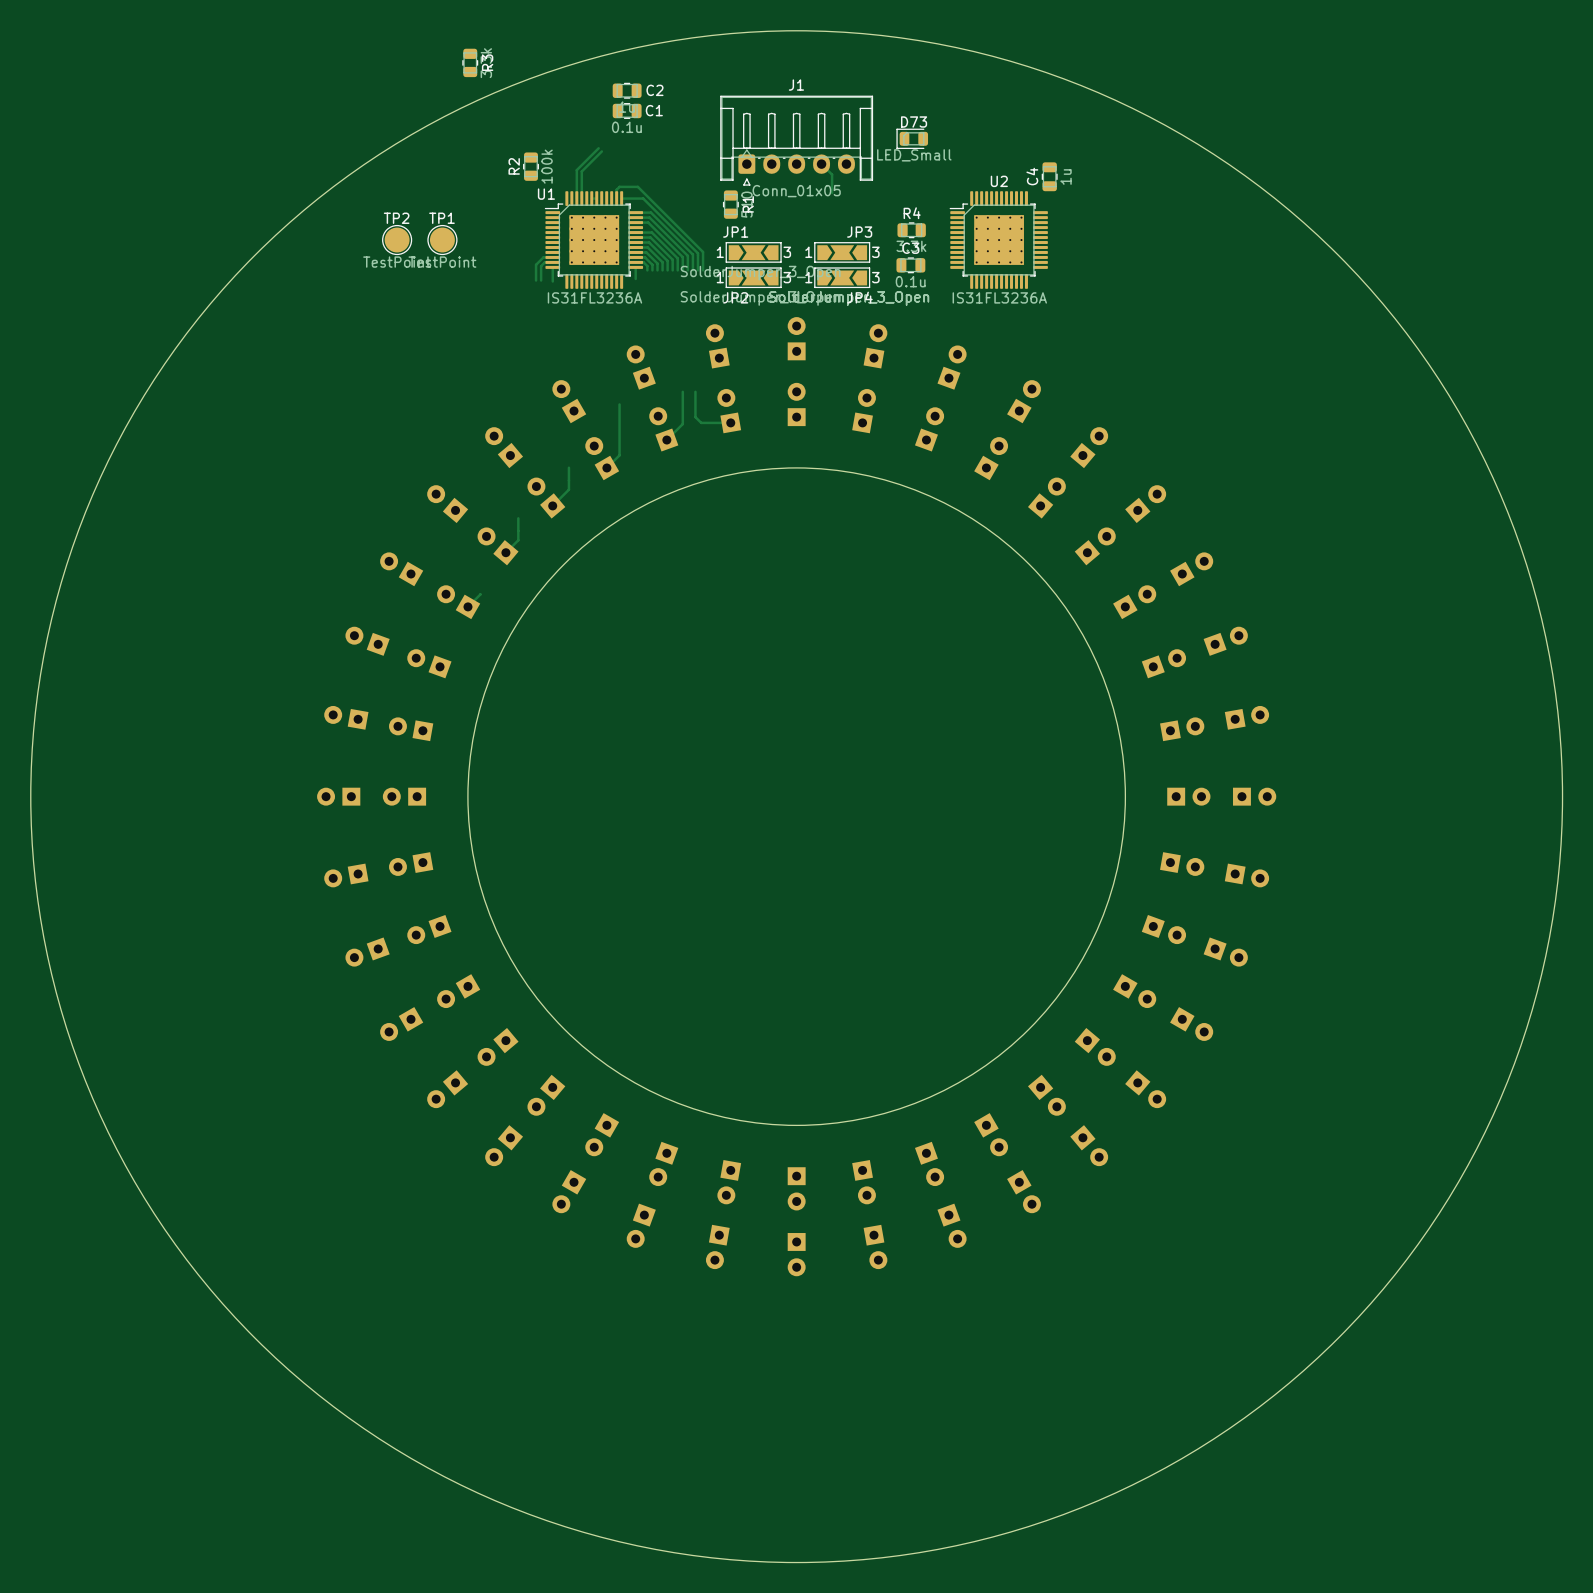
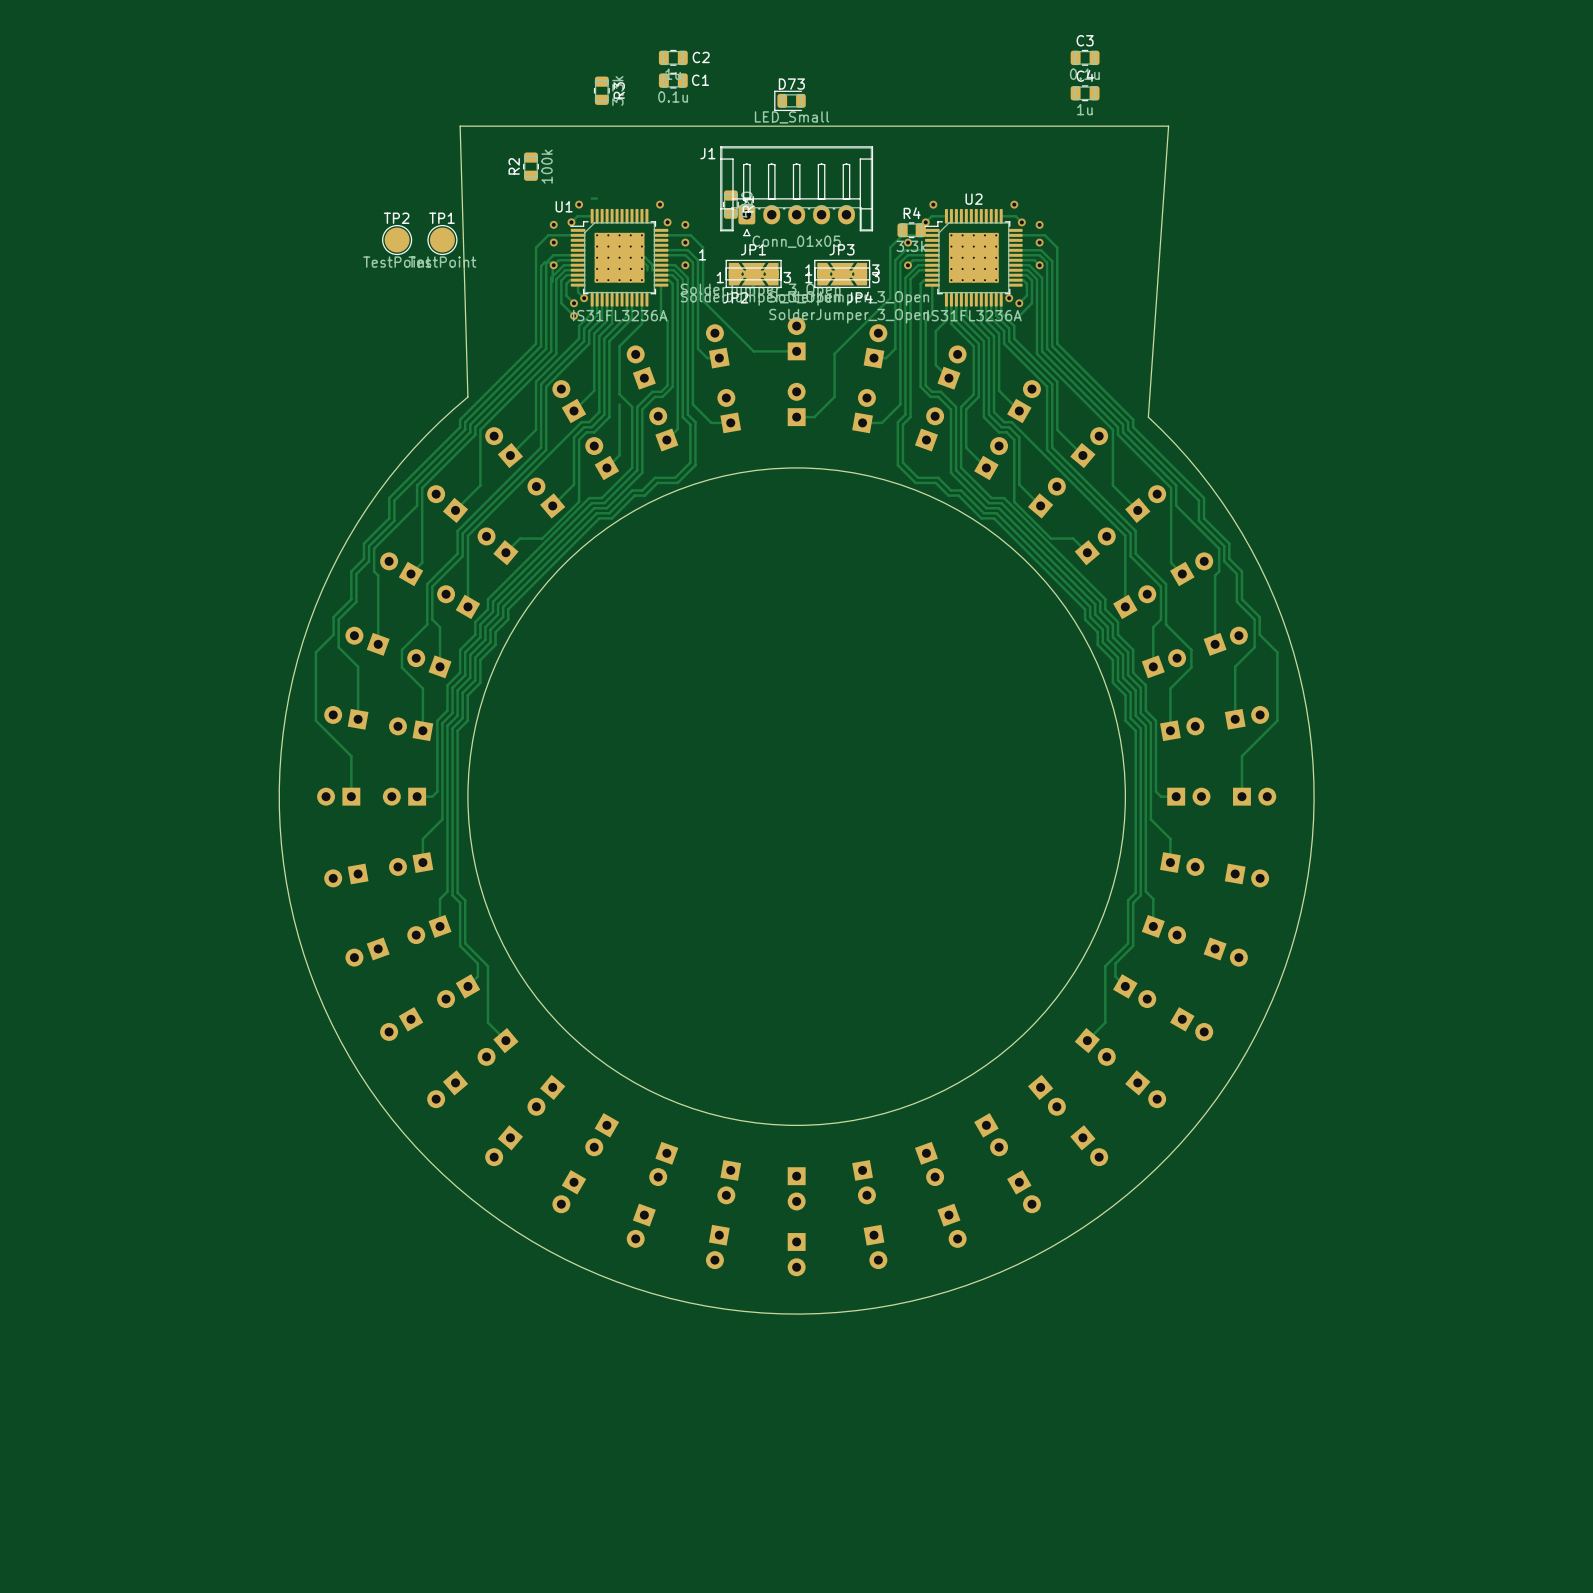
round board edge: [30, 30, 1564, 1564] -> none
R3 position: (470, 62) -> (601, 90)
J1 name position: J1 (796, 85) -> J1 (707, 153)
C2 position: (627, 90) -> (673, 57)
C1 position: (627, 110) -> (673, 80)
board edge: none -> (460, 126) (1168, 126) (1148, 417) (1187, 457) (1221, 501) (1259, 566) (1282, 617) (1298, 671) (1309, 726) (1314, 801) (1310, 857) (1296, 930) (1279, 983) (1246, 1051) (1216, 1098) (1168, 1156) (1127, 1194) (1082, 1227) (1034, 1256) (983, 1279) (929, 1296) (874, 1308) (837, 1312) (781, 1313) (744, 1311) (688, 1302) (634, 1288) (582, 1267) (548, 1250) (501, 1221) (456, 1186) (429, 1161) (392, 1119) (359, 1073) (332, 1024) (304, 955) (289, 900) (283, 864) (279, 789) (285, 714) (297, 659) (308, 624) (322, 589) (347, 539) (378, 492) (401, 462) (439, 421) (467, 397) (460, 126)
D73 position: (912, 138) -> (790, 100)
J1 position: (796, 140) -> (796, 191)
track: (598, 148) (576, 170) (576, 198) -> none
track: (601, 151) (581, 171) (581, 198) -> none
track: (821, 164) (832, 174) (832, 192) -> none
C4 rotation: 0° (1049, 176) -> 90° clockwise (1085, 93)
C4 position: (1049, 176) -> (1085, 93)
U1 name position: U1 (546, 194) -> U1 (564, 206)
track: (616, 198) (616, 189) (619, 186) (637, 186) (703, 252) -> (661, 235) (690, 235) (703, 247) (703, 252)
track: (621, 198) (643, 198) (697, 253) (697, 260) -> (661, 250) (687, 250) (697, 260)
via: none -> (579, 204)
via: none -> (660, 204)
via: none -> (933, 204)
via: none -> (1014, 204)
track: (635, 212) (650, 212) (692, 254) (692, 262) -> (661, 255) (685, 255) (692, 262)
track: none -> (592, 216) (577, 216) (571, 222)
track: none -> (946, 216) (931, 216) (925, 222)
track: none -> (1001, 216) (1015, 216) (1021, 222)
track: (635, 217) (649, 217) (687, 255) (687, 270) -> none
via: none -> (571, 222)
track: (635, 222) (648, 222) (682, 257) (682, 270) -> none
via: none -> (667, 222)
via: none -> (925, 222)
via: none -> (1021, 222)
via: none -> (553, 224)
via: none -> (685, 224)
via: none -> (1039, 224)
track: (635, 232) (651, 232) (677, 258) (677, 270) -> none
JP1 name position: JP1 (735, 232) -> JP1 (753, 249)
JP3 name position: JP3 (859, 232) -> JP3 (841, 249)
track: none -> (932, 235) (902, 235) (890, 247) (890, 298) (834, 353) (834, 396) (814, 417) (796, 417)
track: none -> (1015, 235) (1044, 235) (1057, 247) (1057, 343) (1133, 419) (1133, 427) (1204, 498) (1204, 518) (1229, 543) (1229, 558) (1241, 571) (1241, 599) (1259, 617) (1259, 634) (1277, 652) (1277, 720) (1241, 756) (1241, 796)
track: (635, 237) (650, 237) (672, 259) (672, 270) -> none
U1 position: (593, 240) -> (619, 257)
U2 position: (998, 240) -> (973, 257)
via: none -> (553, 242)
track: (635, 242) (649, 242) (667, 260) (667, 270) -> none
via: none -> (685, 242)
via: none -> (908, 242)
via: none -> (1039, 242)
track: (635, 247) (647, 247) (662, 262) (662, 270) -> none
track: none -> (932, 250) (905, 250) (895, 260) (895, 348) (886, 358) (873, 358)
track: none -> (1015, 250) (1041, 250) (1052, 261) (1052, 346) (1128, 422) (1128, 429) (1198, 500) (1198, 520) (1224, 546) (1224, 561) (1236, 574) (1236, 601) (1254, 619) (1254, 647) (1235, 666) (1235, 719)
track: (635, 252) (646, 252) (657, 263) (657, 270) -> none
JP1 text position: 1 (720, 252) -> 1 (702, 254)
JP1 position: (753, 252) -> (753, 270)
JP1 text: 3 (787, 252) -> none
JP3 position: (842, 252) -> (842, 270)
track: none -> (578, 255) (553, 255) (546, 262) (546, 348) (470, 424) (470, 432) (417, 485) (417, 505) (374, 548) (374, 571) (378, 575) (378, 644)
track: none -> (932, 255) (907, 255) (900, 262) (900, 404) (881, 422) (862, 422)
track: none -> (1015, 255) (1039, 255) (1047, 262) (1047, 348) (1123, 424) (1123, 432) (1176, 485) (1176, 505) (1219, 548) (1219, 571) (1215, 575) (1215, 644)
track: (552, 257) (543, 257) (536, 264) -> (578, 235) (548, 235) (536, 247) (536, 264)
track: none -> (578, 260) (558, 260) (553, 265)
track: none -> (932, 260) (912, 260) (907, 265)
track: none -> (1015, 260) (1034, 260) (1039, 265)
via: none -> (553, 265)
track: none -> (578, 265) (563, 265) (551, 277) (551, 351) (475, 427) (475, 434) (422, 487) (422, 562) (411, 574)
track: none -> (661, 265) (675, 265) (687, 277) (687, 414) (695, 422) (695, 465) (677, 482) (657, 482) (644, 495) (634, 495) (611, 518) (599, 518) (508, 609) (508, 619) (495, 632) (495, 644) (480, 660) (480, 682) (467, 695) (467, 720) (457, 730) (457, 892) (465, 900) (465, 943) (487, 966) (487, 1022) (505, 1040)
via: none -> (685, 265)
via: none -> (907, 265)
C3 position: (910, 265) -> (1085, 57)
track: none -> (932, 265) (918, 265) (905, 277) (905, 414) (897, 422) (897, 465) (915, 482) (935, 482) (948, 495) (958, 495) (981, 518) (994, 518) (1085, 609) (1085, 619) (1097, 632) (1097, 644) (1112, 660) (1112, 682) (1125, 695) (1125, 720) (1135, 730) (1135, 892) (1128, 900) (1128, 943) (1105, 966) (1105, 1022) (1087, 1040)
track: none -> (1015, 265) (1029, 265) (1042, 277) (1042, 351) (1117, 427) (1117, 434) (1171, 487) (1171, 562) (1182, 574)
via: none -> (1039, 265)
track: (635, 267) (635, 278) -> none
track: none -> (578, 270) (565, 270) (556, 279) (556, 353) (480, 429) (480, 485) (455, 510)
track: none -> (661, 270) (673, 270) (682, 279) (682, 391)
track: none -> (697, 270) (697, 348) (707, 358) (719, 358)
track: none -> (703, 270) (703, 300) (753, 351) (796, 351)
track: none -> (932, 270) (919, 270) (910, 279) (910, 417) (902, 424) (902, 462) (918, 477) (938, 477) (951, 490) (961, 490) (983, 513) (996, 513) (1090, 606) (1090, 617) (1102, 629) (1102, 642) (1117, 657) (1117, 680) (1130, 692) (1130, 718) (1140, 728) (1140, 895) (1133, 902) (1133, 945) (1115, 963) (1115, 976) (1125, 986)
track: none -> (1015, 270) (1027, 270) (1037, 279) (1037, 353) (1112, 429) (1112, 485) (1137, 510)
track: none -> (578, 275) (566, 275) (561, 280) (561, 303) (574, 315)
track: none -> (1015, 275) (1026, 275) (1031, 280) (1031, 303) (1019, 315)
track: none -> (536, 280) (536, 343) (460, 419) (460, 427) (389, 498) (389, 518) (364, 543) (364, 558) (351, 571) (351, 599) (333, 617) (333, 634) (315, 652) (315, 720) (351, 756) (351, 796)
track: none -> (541, 280) (541, 346) (465, 422) (465, 429) (394, 500) (394, 520) (369, 546) (369, 561) (356, 574) (356, 601) (338, 619) (338, 647) (358, 666) (358, 719)
track: none -> (578, 280) (570, 280) (566, 283) (566, 295) (574, 303)
track: none -> (661, 280) (669, 280) (672, 283) (672, 386) (662, 396) (654, 396) (642, 409) (642, 472) (606, 508) (594, 508) (498, 604) (498, 614) (485, 627) (485, 639) (470, 654) (470, 677) (457, 690) (457, 715) (447, 725) (447, 891) (440, 899) (440, 926)
track: none -> (932, 280) (924, 280) (920, 283) (920, 386) (930, 396) (938, 396) (951, 409) (951, 472) (986, 508) (999, 508) (1095, 604) (1095, 614) (1107, 627) (1107, 639) (1123, 654) (1123, 677) (1135, 690) (1135, 715) (1145, 725) (1145, 891) (1153, 899) (1153, 926)
track: none -> (1015, 280) (1023, 280) (1026, 283) (1026, 295) (1019, 303)
track: none -> (578, 285) (578, 292) (584, 298)
track: none -> (661, 285) (661, 314) (667, 320) (667, 385) (661, 391) (652, 391) (637, 407) (637, 470) (604, 503) (591, 503) (493, 601) (493, 611) (480, 624) (480, 637) (465, 652) (465, 675) (452, 687) (452, 713) (442, 723) (442, 819) (422, 838) (422, 862)
track: none -> (932, 285) (932, 314) (925, 320) (925, 385) (932, 391) (940, 391) (956, 407) (956, 470) (988, 503) (1001, 503) (1100, 601) (1100, 611) (1112, 624) (1112, 637) (1128, 652) (1128, 675) (1140, 687) (1140, 713) (1150, 723) (1150, 819) (1170, 838) (1170, 862)
via: none -> (584, 298)
via: none -> (1009, 298)
track: none -> (592, 299) (592, 312) (579, 326) (579, 338) (536, 381) (536, 429) (510, 455)
track: none -> (597, 299) (597, 315) (584, 328) (584, 341) (541, 384) (541, 447) (457, 530) (457, 553) (427, 584) (427, 624) (401, 649) (401, 667) (422, 688) (422, 730)
track: none -> (602, 299) (602, 318) (589, 331) (589, 343) (546, 386) (546, 450) (462, 533) (462, 556) (432, 586) (432, 619) (440, 627) (440, 666)
track: none -> (607, 299) (607, 320) (594, 333) (594, 390) (574, 411)
track: none -> (641, 299) (641, 323) (619, 346) (619, 394) (632, 407) (632, 467) (601, 498) (589, 498) (487, 599) (487, 609) (475, 622) (475, 634) (460, 649) (460, 672) (447, 685) (447, 710) (437, 720) (437, 791) (432, 796) (417, 796)
track: none -> (946, 299) (946, 320) (935, 331) (935, 365) (948, 378)
track: none -> (951, 299) (951, 323) (973, 346) (973, 394) (961, 407) (961, 467) (991, 498) (1004, 498) (1105, 599) (1105, 609) (1117, 622) (1117, 634) (1133, 649) (1133, 672) (1145, 685) (1145, 710) (1155, 720) (1155, 791) (1161, 796) (1176, 796)
track: none -> (956, 299) (956, 321) (978, 343) (978, 396) (966, 409) (966, 447) (986, 467)
track: none -> (961, 299) (961, 318) (983, 341) (983, 417) (999, 432) (1006, 432) (1014, 439) (1014, 501) (1050, 538) (1073, 538) (1087, 552)
track: none -> (966, 299) (966, 316) (988, 338) (988, 414) (1001, 427) (1009, 427) (1019, 437) (1019, 484) (1040, 505)
track: none -> (981, 299) (981, 323) (994, 336) (994, 412) (1004, 422) (1011, 422) (1125, 535) (1125, 606)
track: none -> (986, 299) (986, 320) (999, 333) (999, 390) (1019, 411)
track: none -> (991, 299) (991, 318) (1004, 331) (1004, 343) (1047, 386) (1047, 450) (1130, 533) (1130, 556) (1161, 586) (1161, 619) (1153, 627) (1153, 666)
track: none -> (996, 299) (996, 315) (1009, 328) (1009, 341) (1052, 384) (1052, 447) (1135, 530) (1135, 553) (1166, 584) (1166, 624) (1191, 649) (1191, 667) (1170, 688) (1170, 730)
track: none -> (1001, 299) (1001, 312) (1014, 326) (1014, 338) (1057, 381) (1057, 429) (1082, 455)
via: none -> (574, 303)
via: none -> (1019, 303)
via: none -> (574, 315)
track: (695, 391) (695, 417) (701, 422) (711, 422) -> (692, 270) (692, 404) (711, 422)
track: (682, 417) (682, 424) (677, 429) -> (661, 275) (672, 275) (677, 280) (677, 429)
track: none -> (682, 417) (690, 424) (690, 462) (675, 477) (654, 477) (642, 490) (632, 490) (609, 513) (596, 513) (503, 606) (503, 617) (490, 629) (490, 642) (475, 657) (475, 680) (462, 692) (462, 718) (452, 728) (452, 895) (460, 902) (460, 945) (477, 963) (477, 976) (467, 986)
track: (568, 467) (568, 489) -> (627, 299) (627, 316) (604, 338) (604, 414) (591, 427) (584, 427) (574, 437) (574, 484) (568, 489)
track: (518, 518) (518, 540) -> (632, 299) (632, 318) (609, 341) (609, 417) (594, 432) (586, 432) (579, 439) (579, 501) (542, 538) (520, 538) (518, 540)
track: (480, 594) (467, 606) -> (612, 299) (612, 323) (599, 336) (599, 412) (589, 422) (581, 422) (467, 535) (467, 606)

